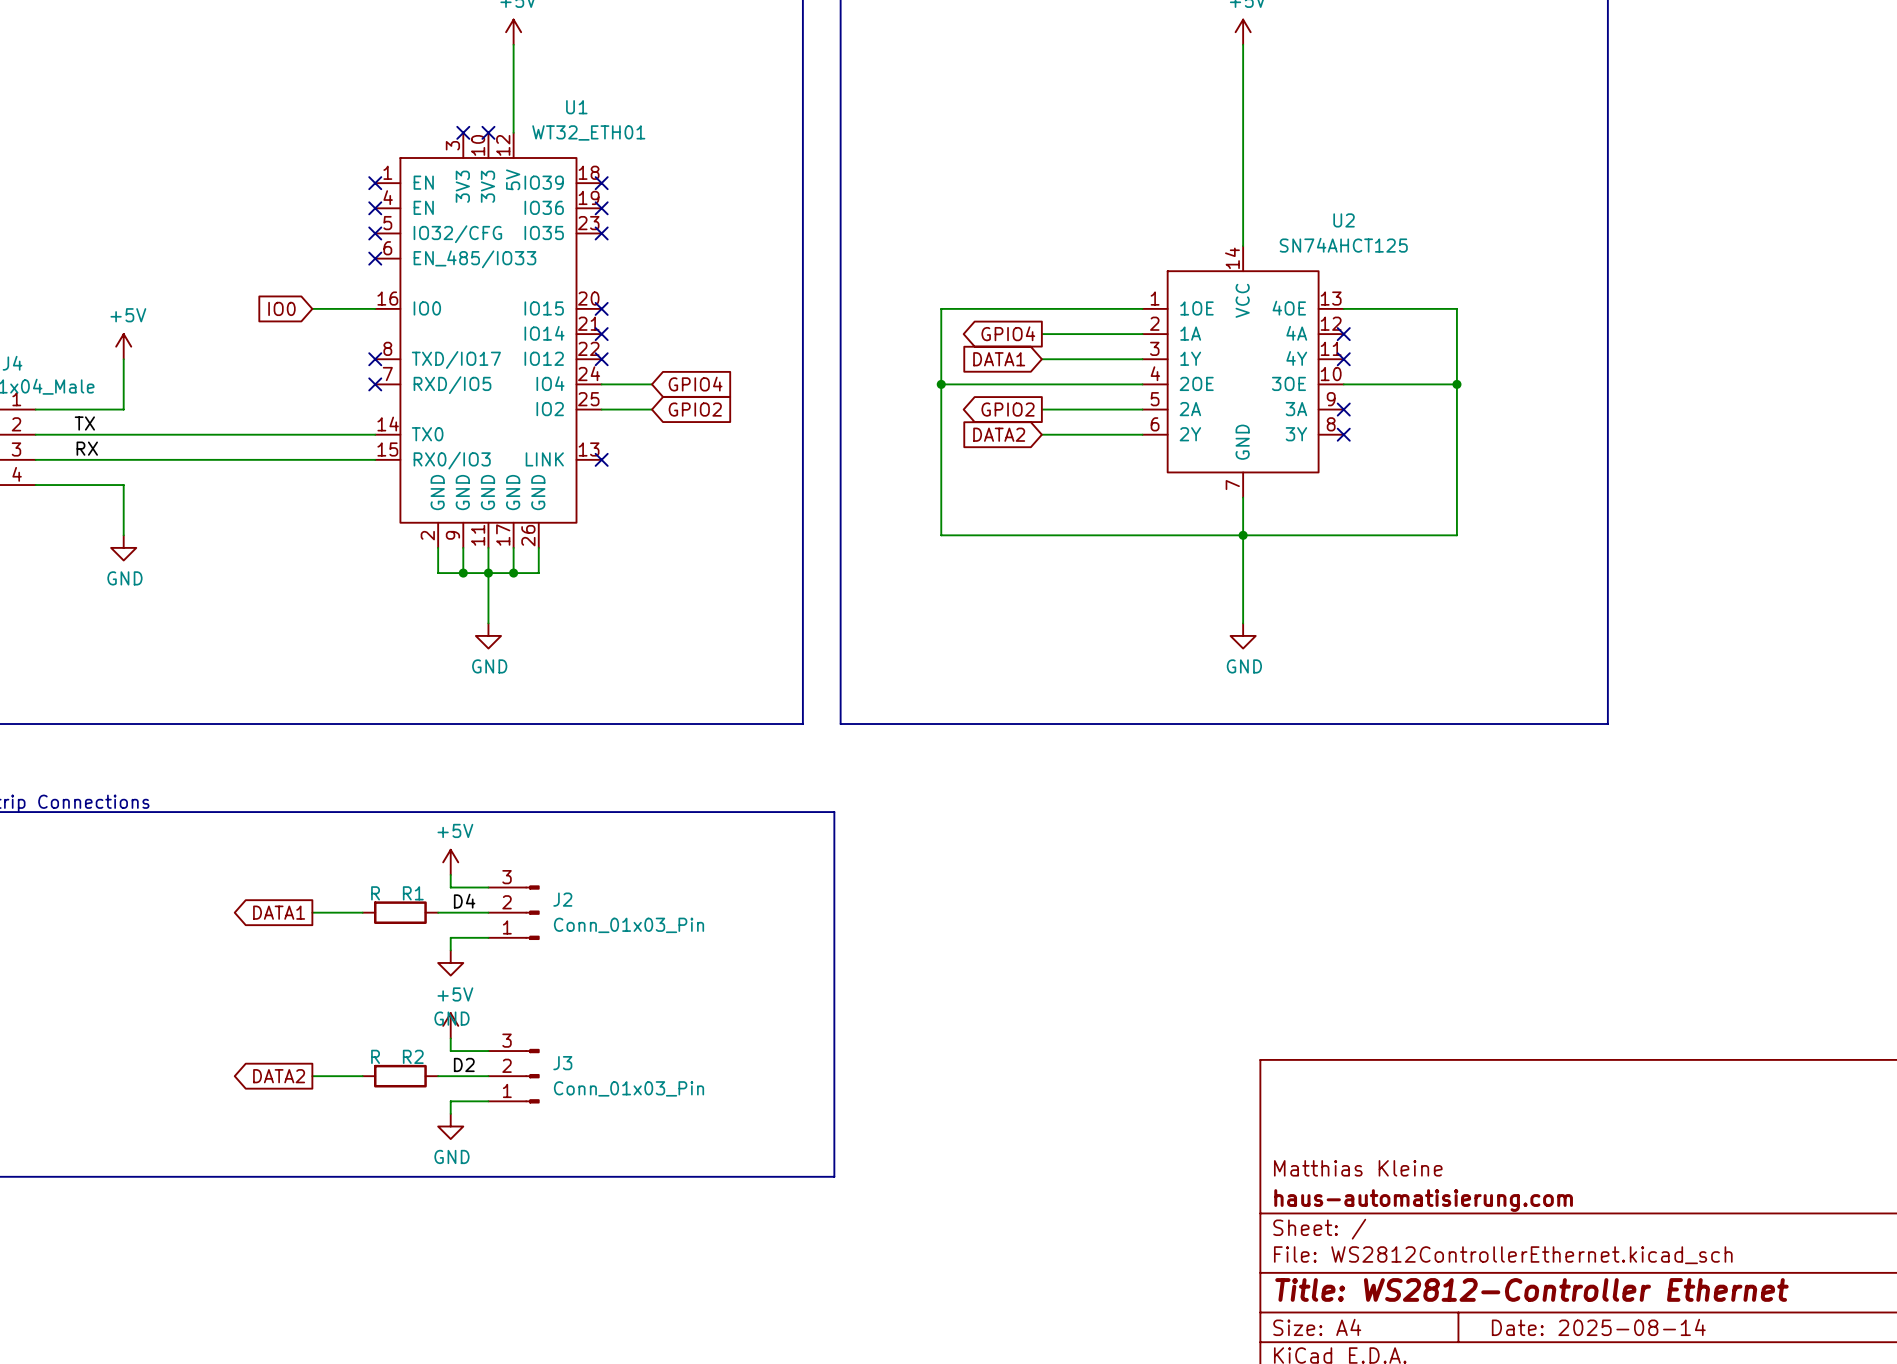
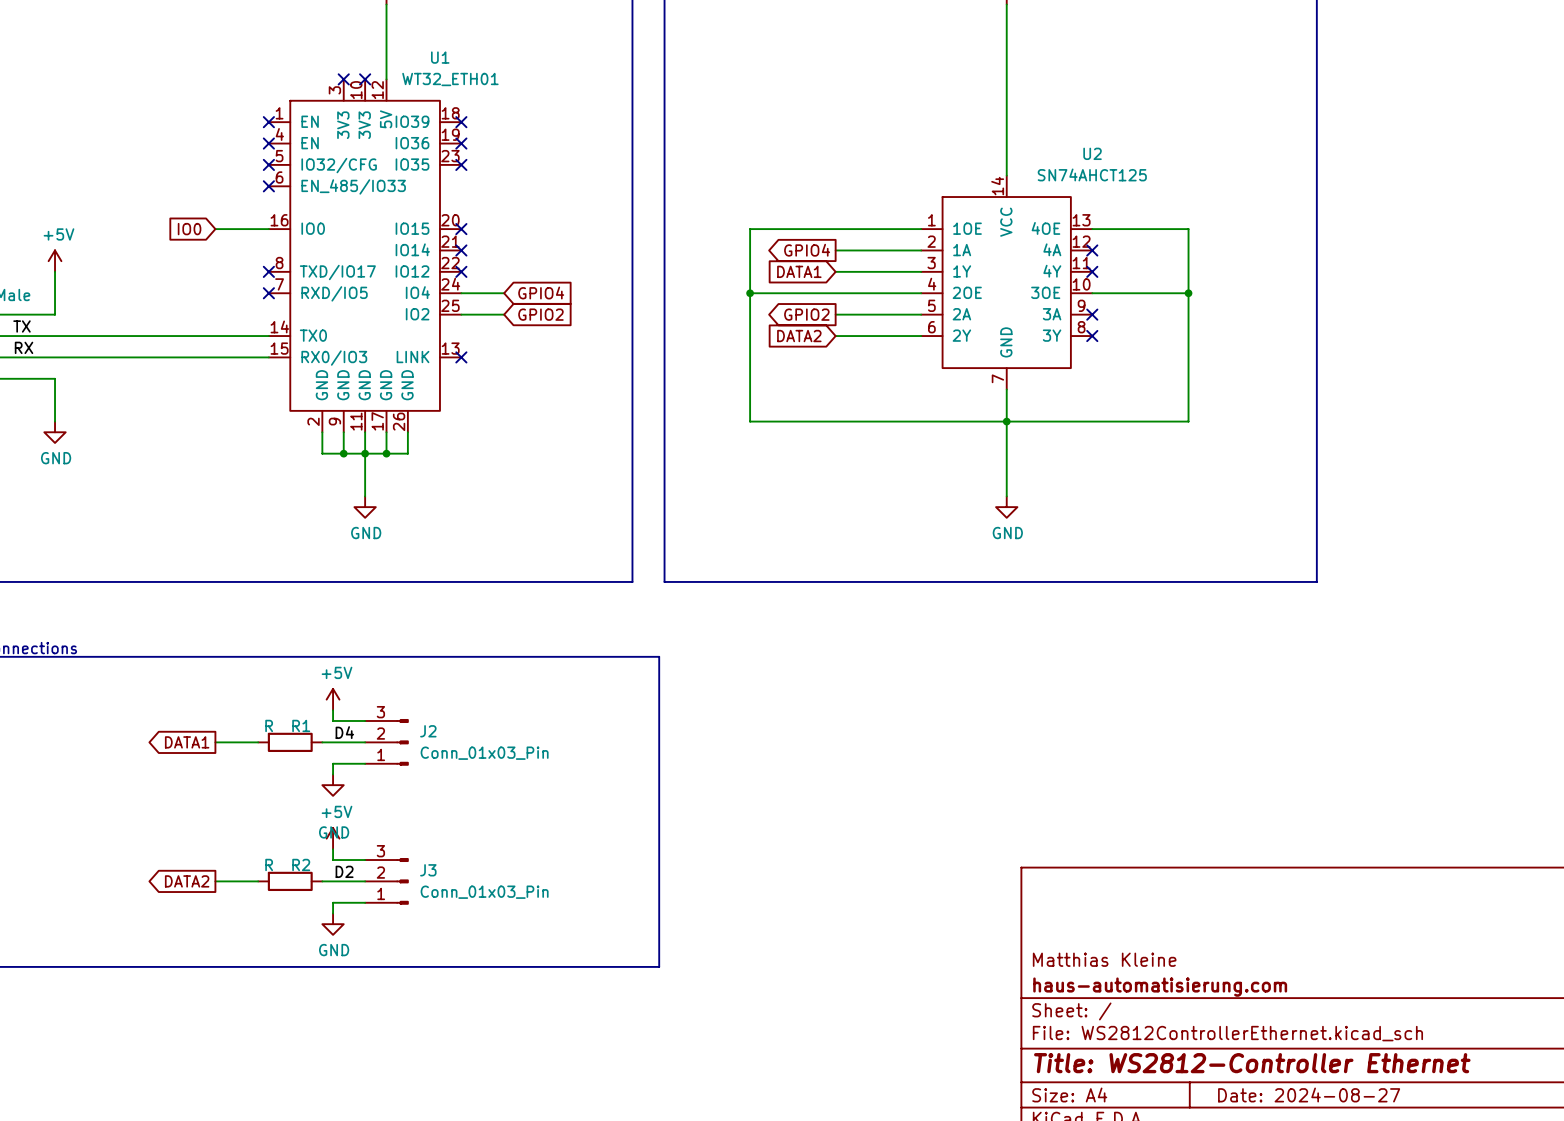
title block: Date: 2025-08-14 (1598, 1327) -> Date: 2024-08-27 (1309, 1095)

